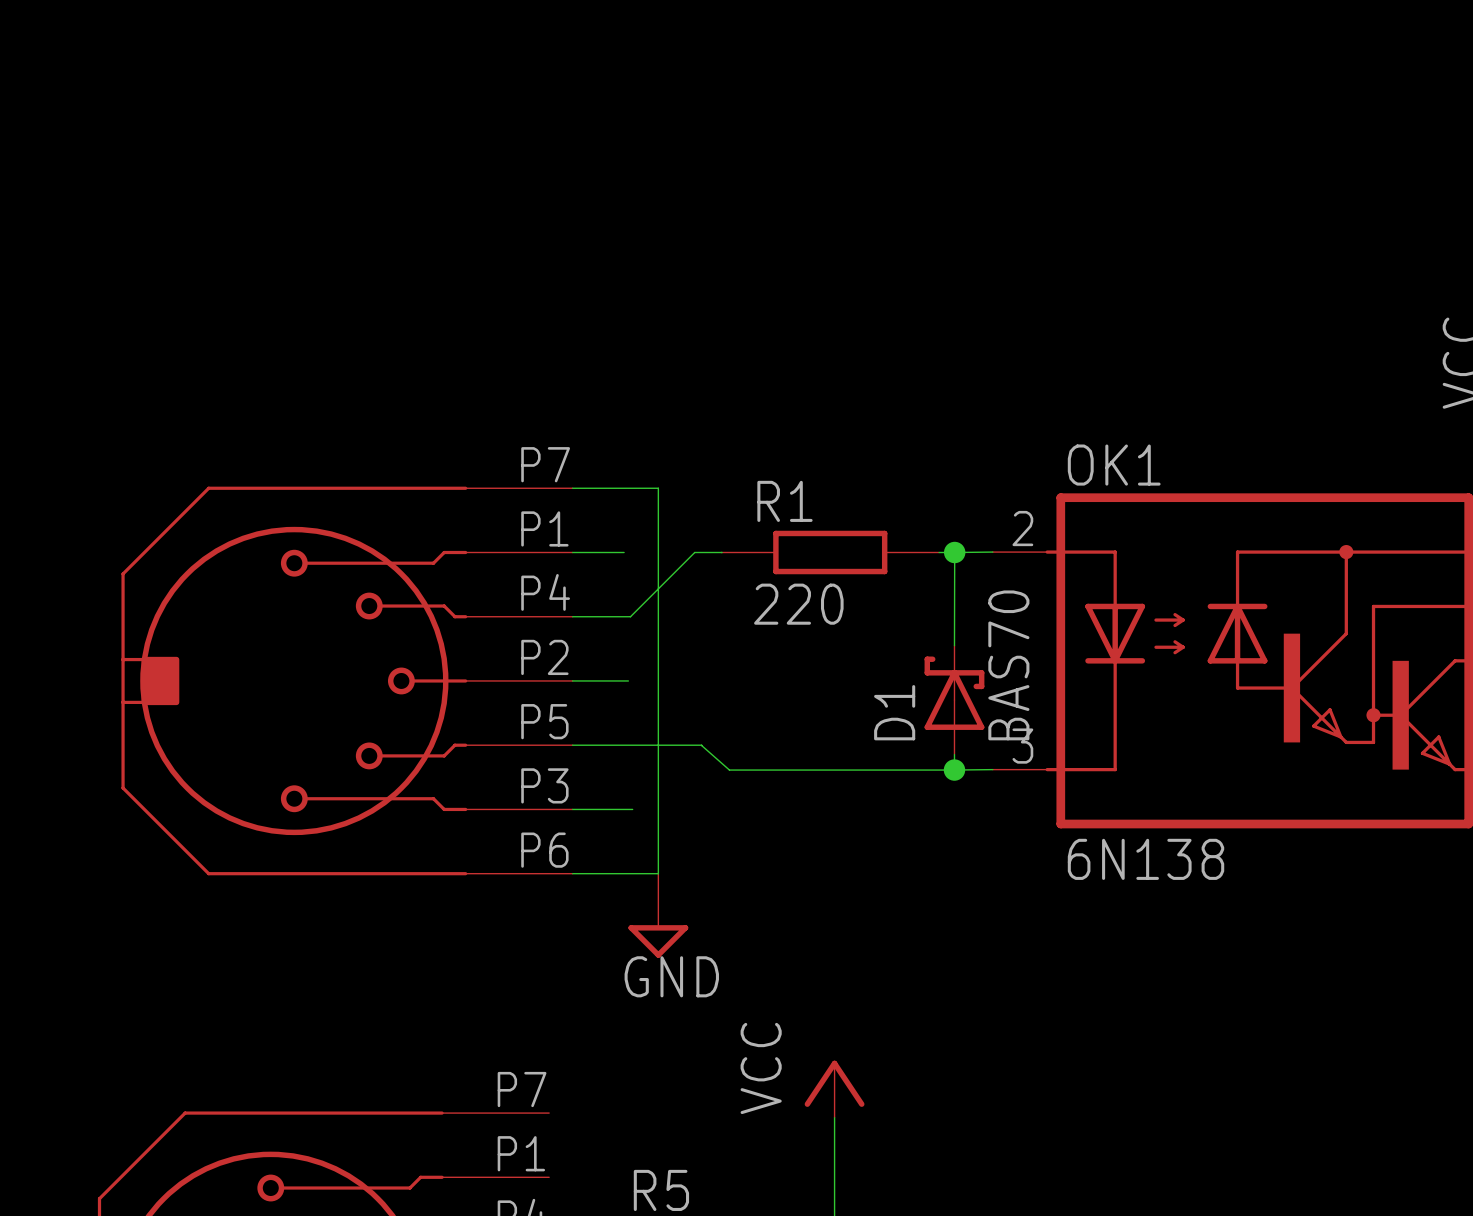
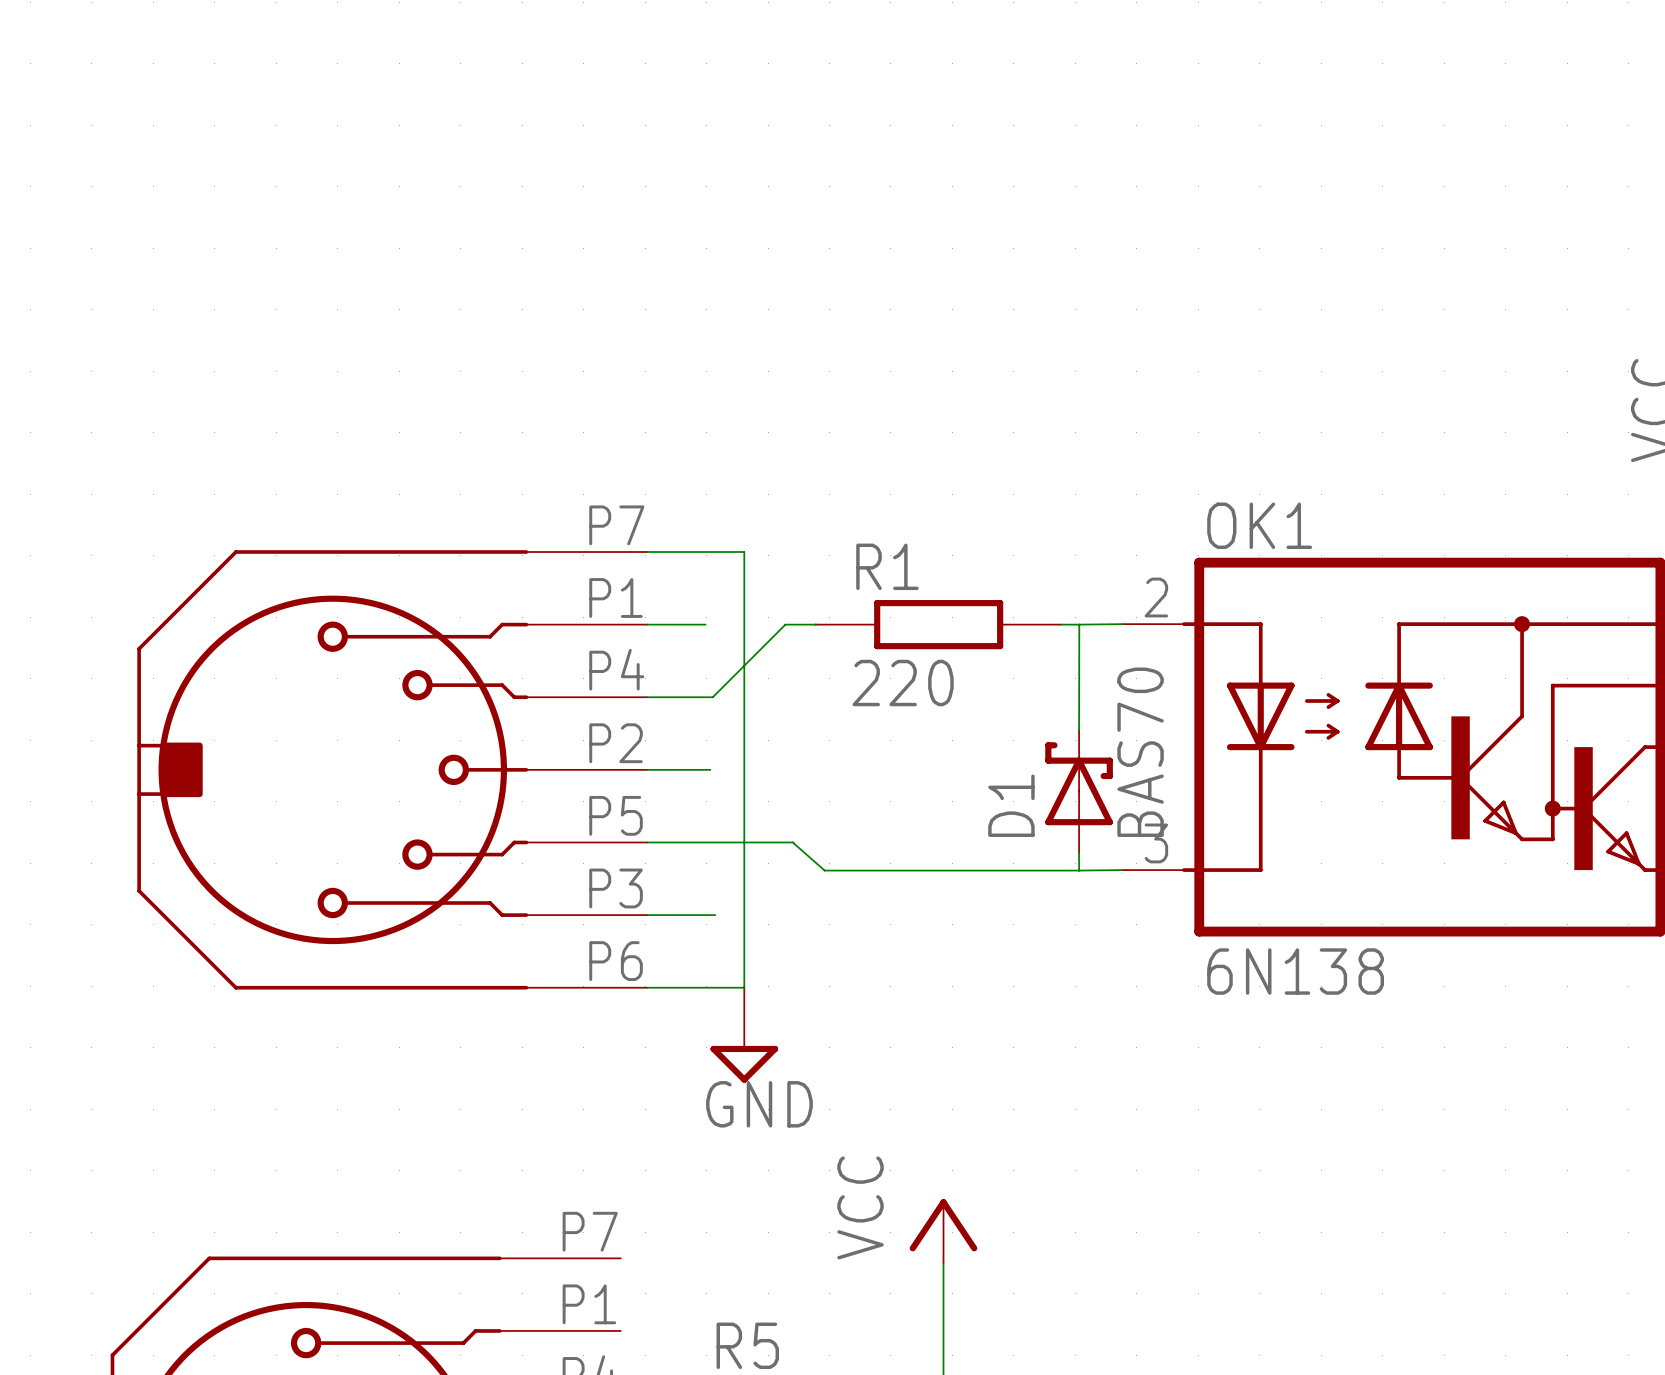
junction: (954, 552) -> none
junction: (954, 770) -> none

